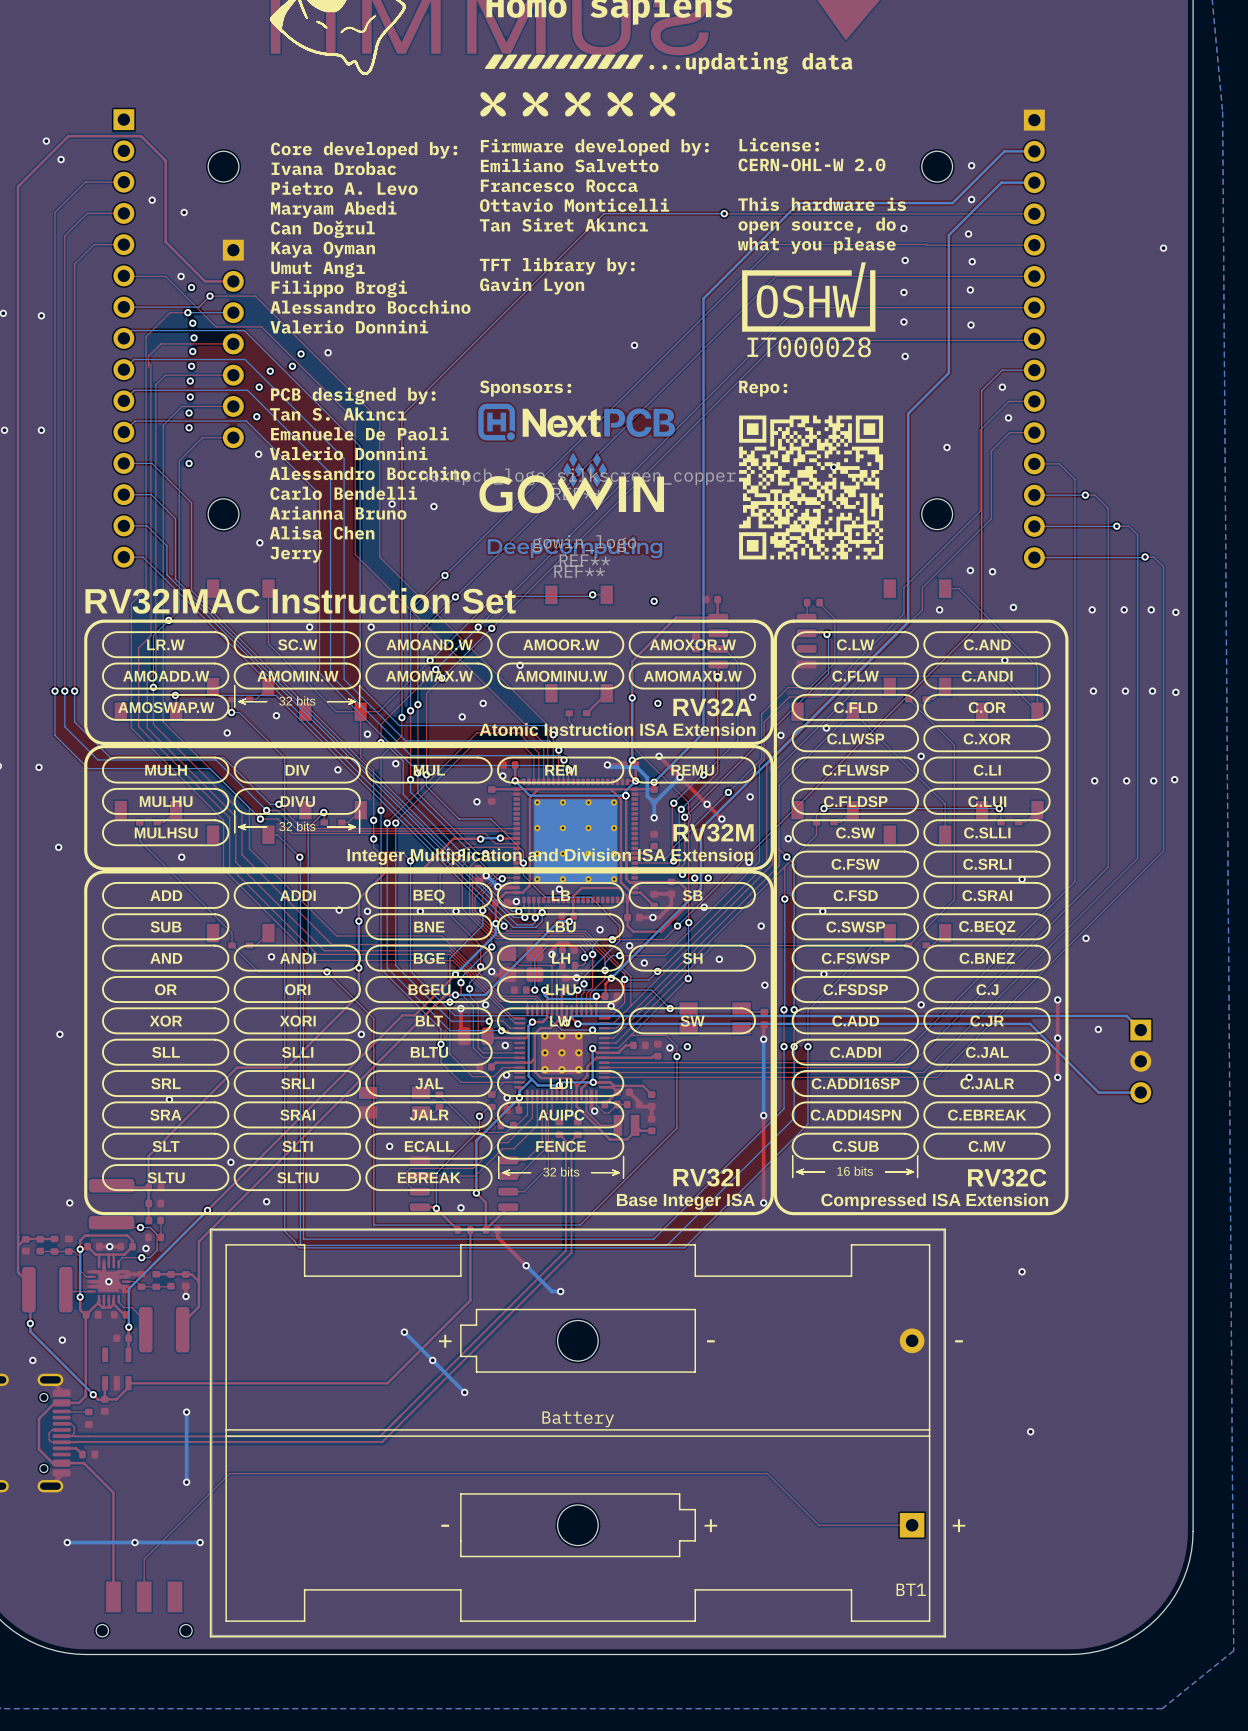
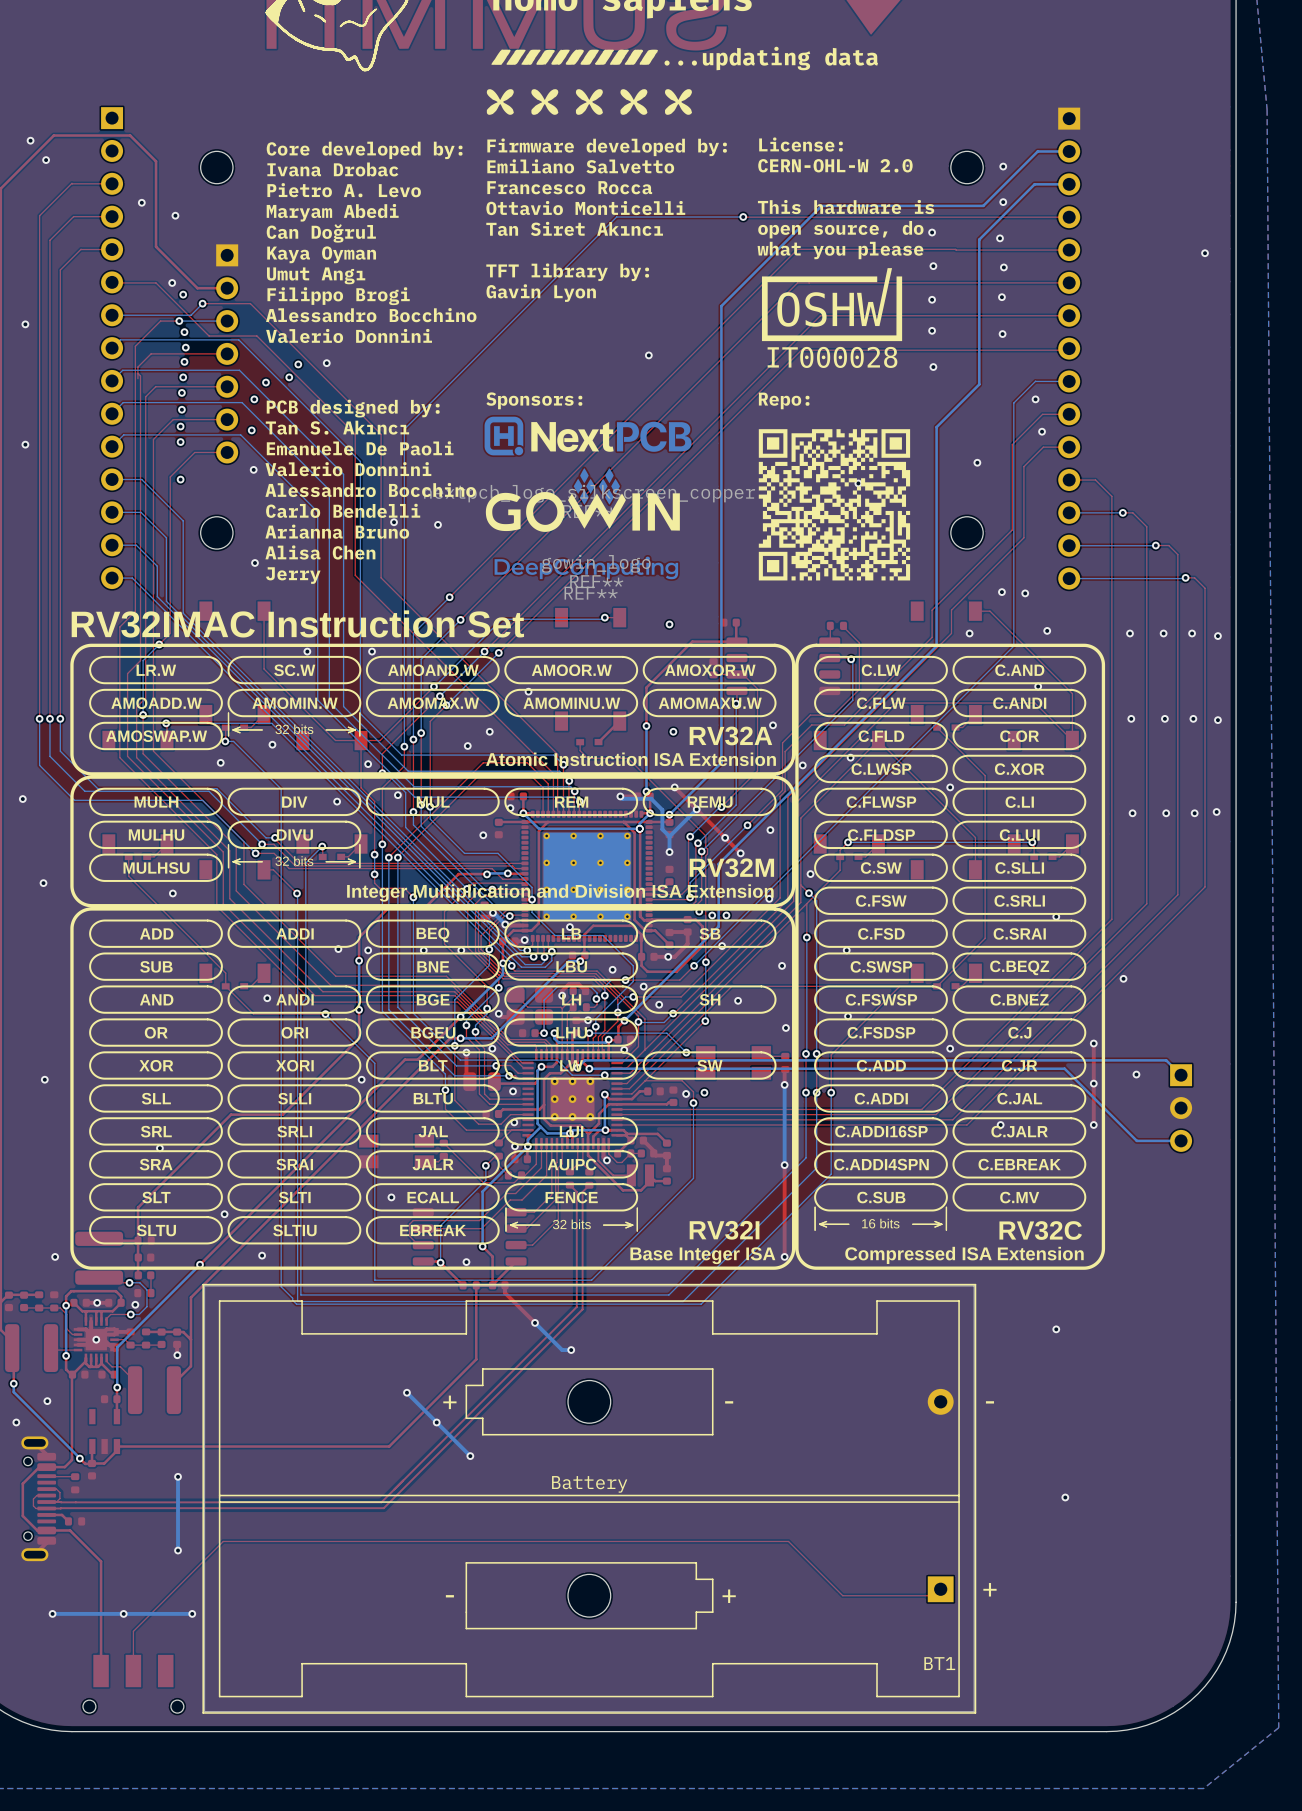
BT1 footprint: [209, 1228, 946, 1638] -> [202, 1283, 977, 1714]

